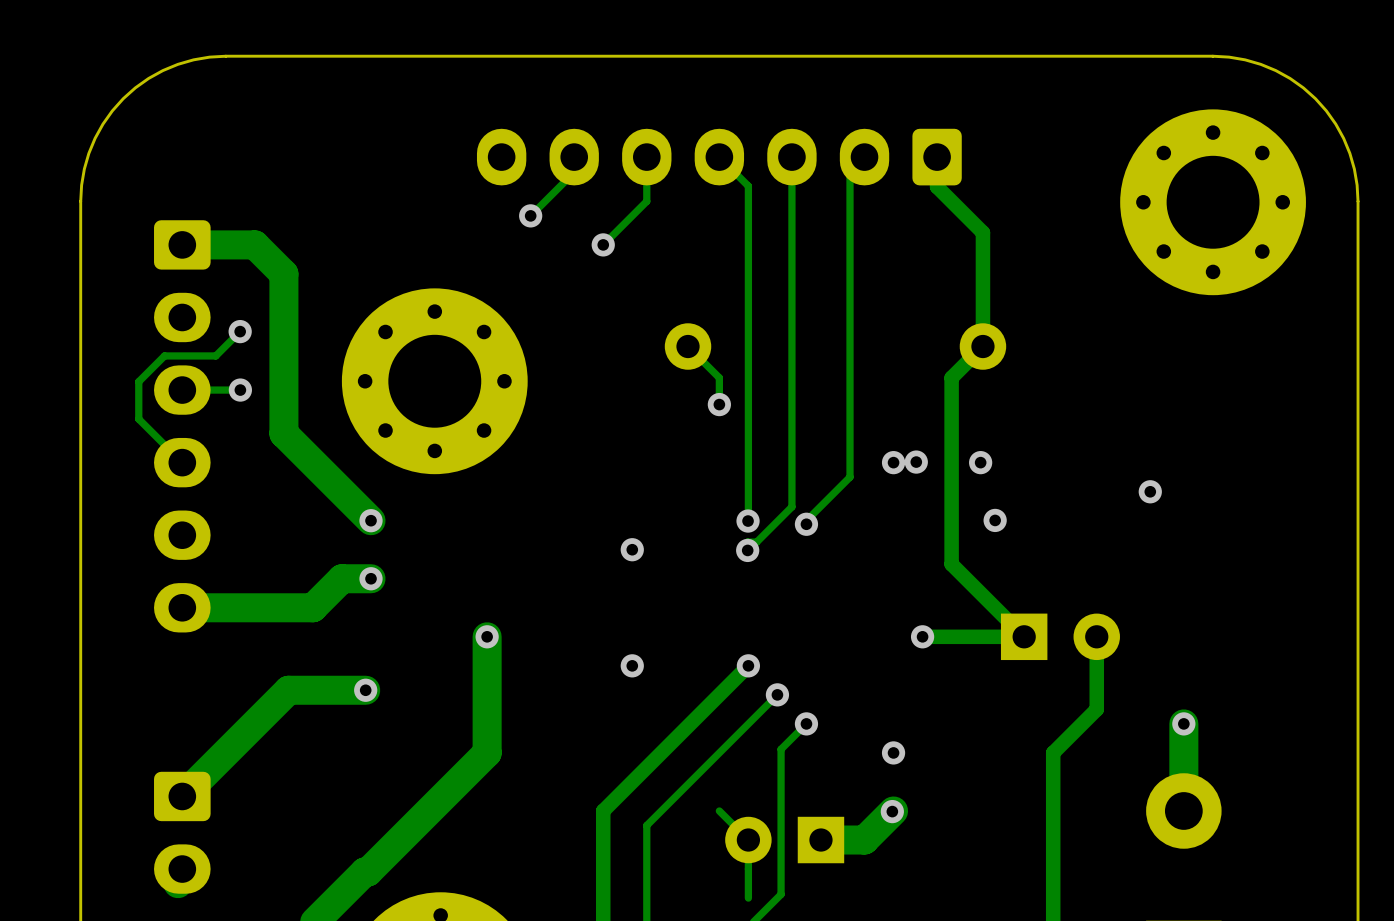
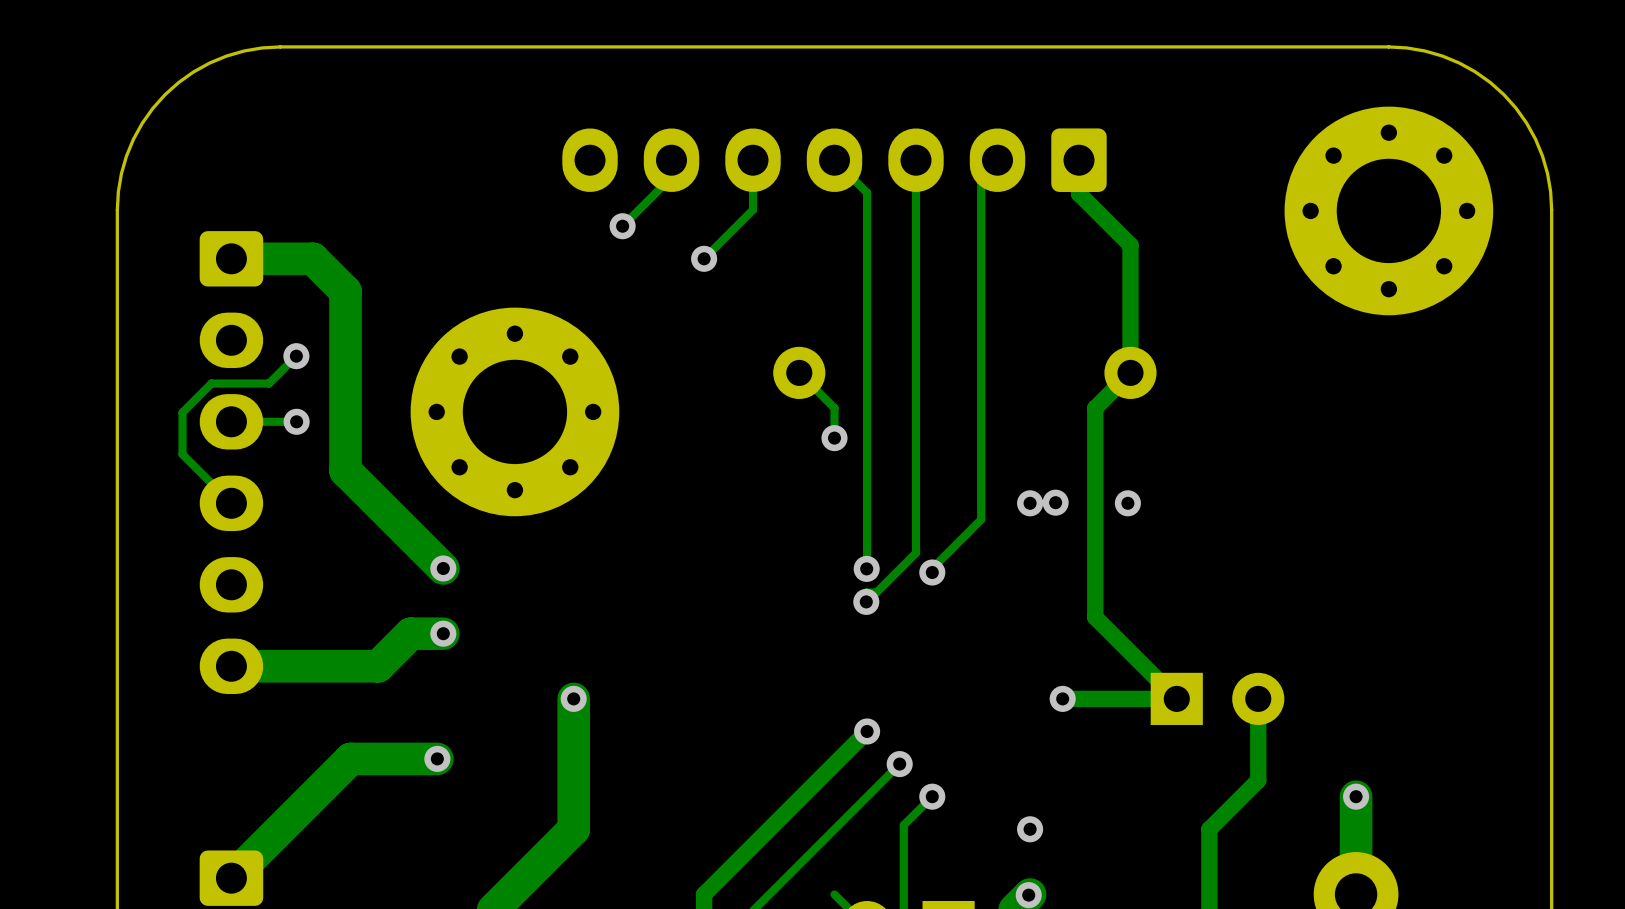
via: (1150, 491) -> none
via: (995, 520) -> none
via: (632, 549) -> none
via: (632, 665) -> none

